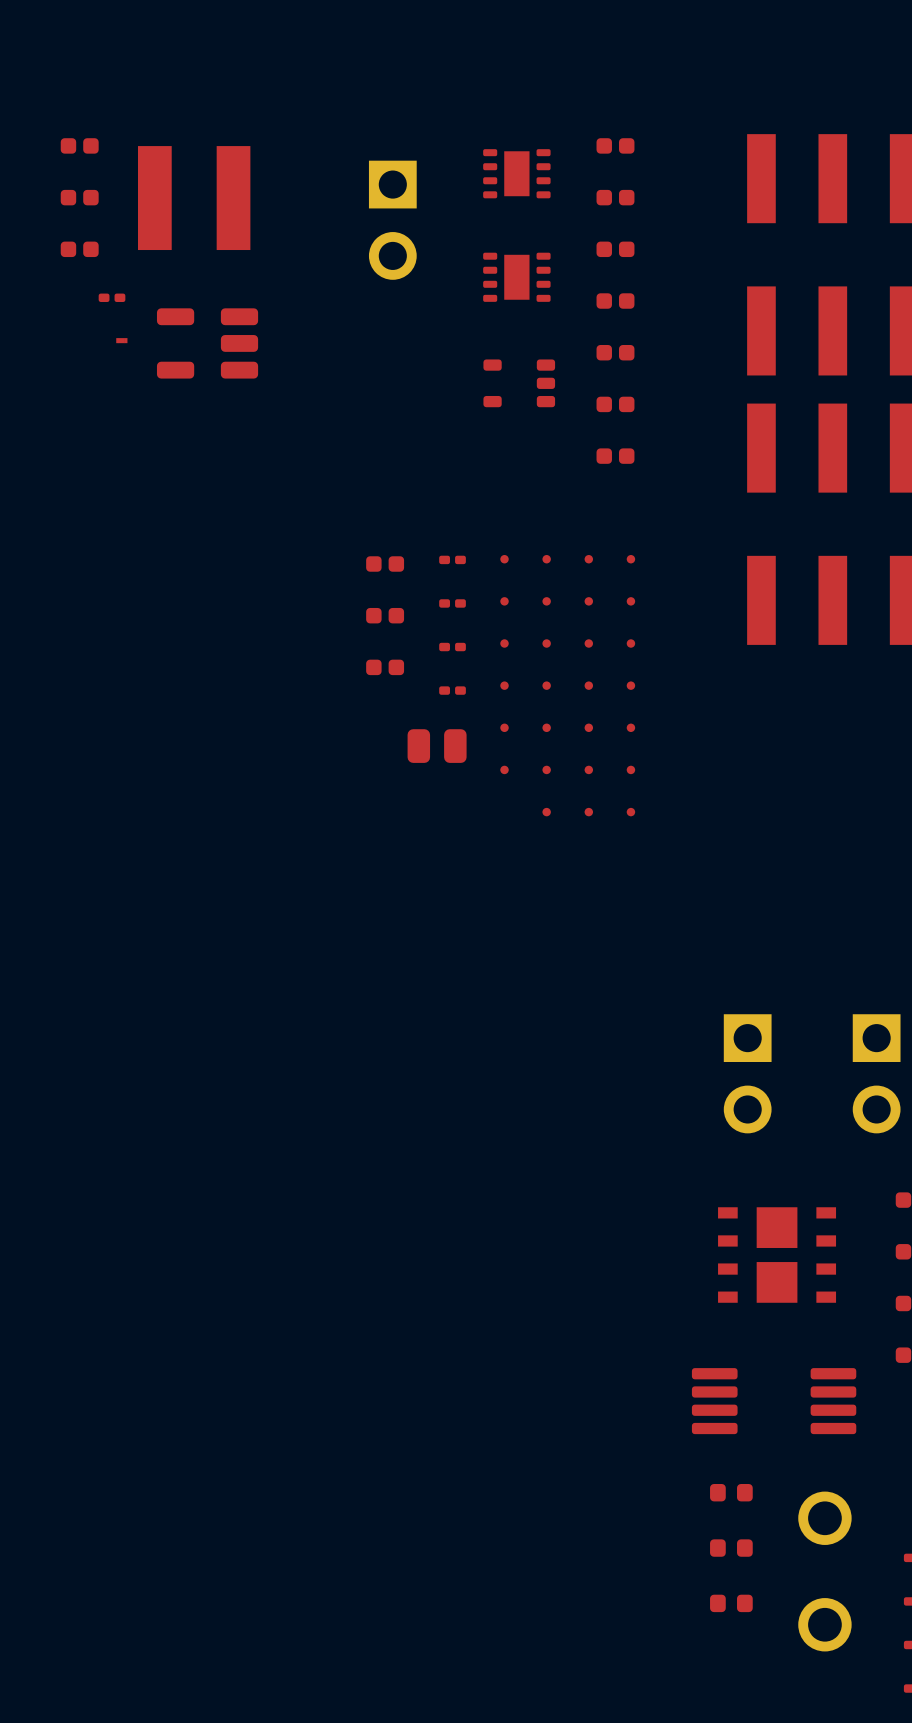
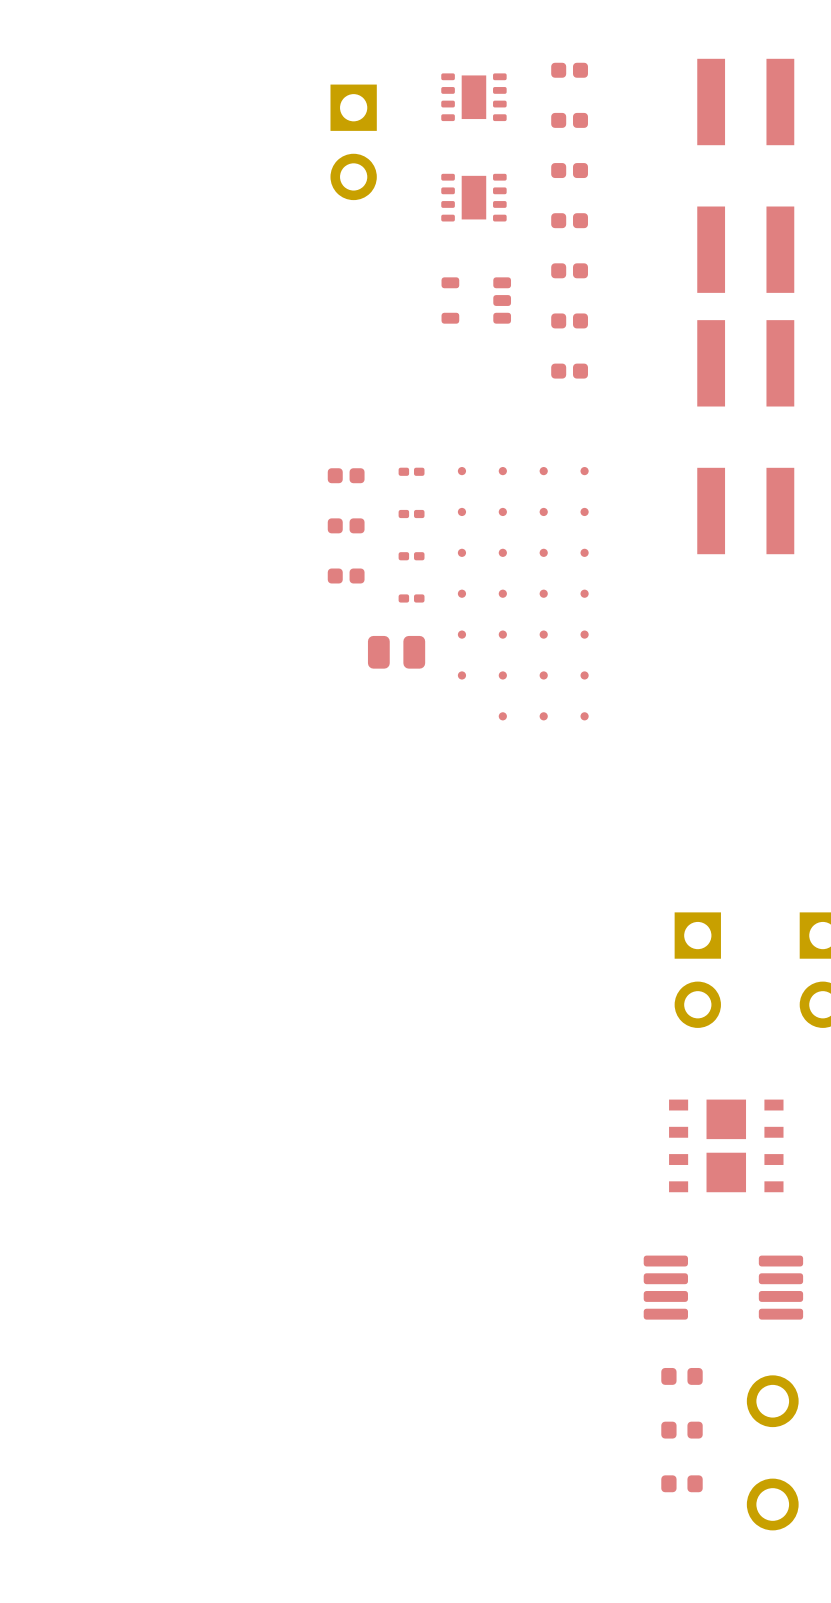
part: (79, 145) -> none
part: (79, 197) -> none
part: (194, 198) -> none
part: (79, 249) -> none
part: (112, 297) -> none
part: (121, 340) -> none
part: (207, 343) -> none

